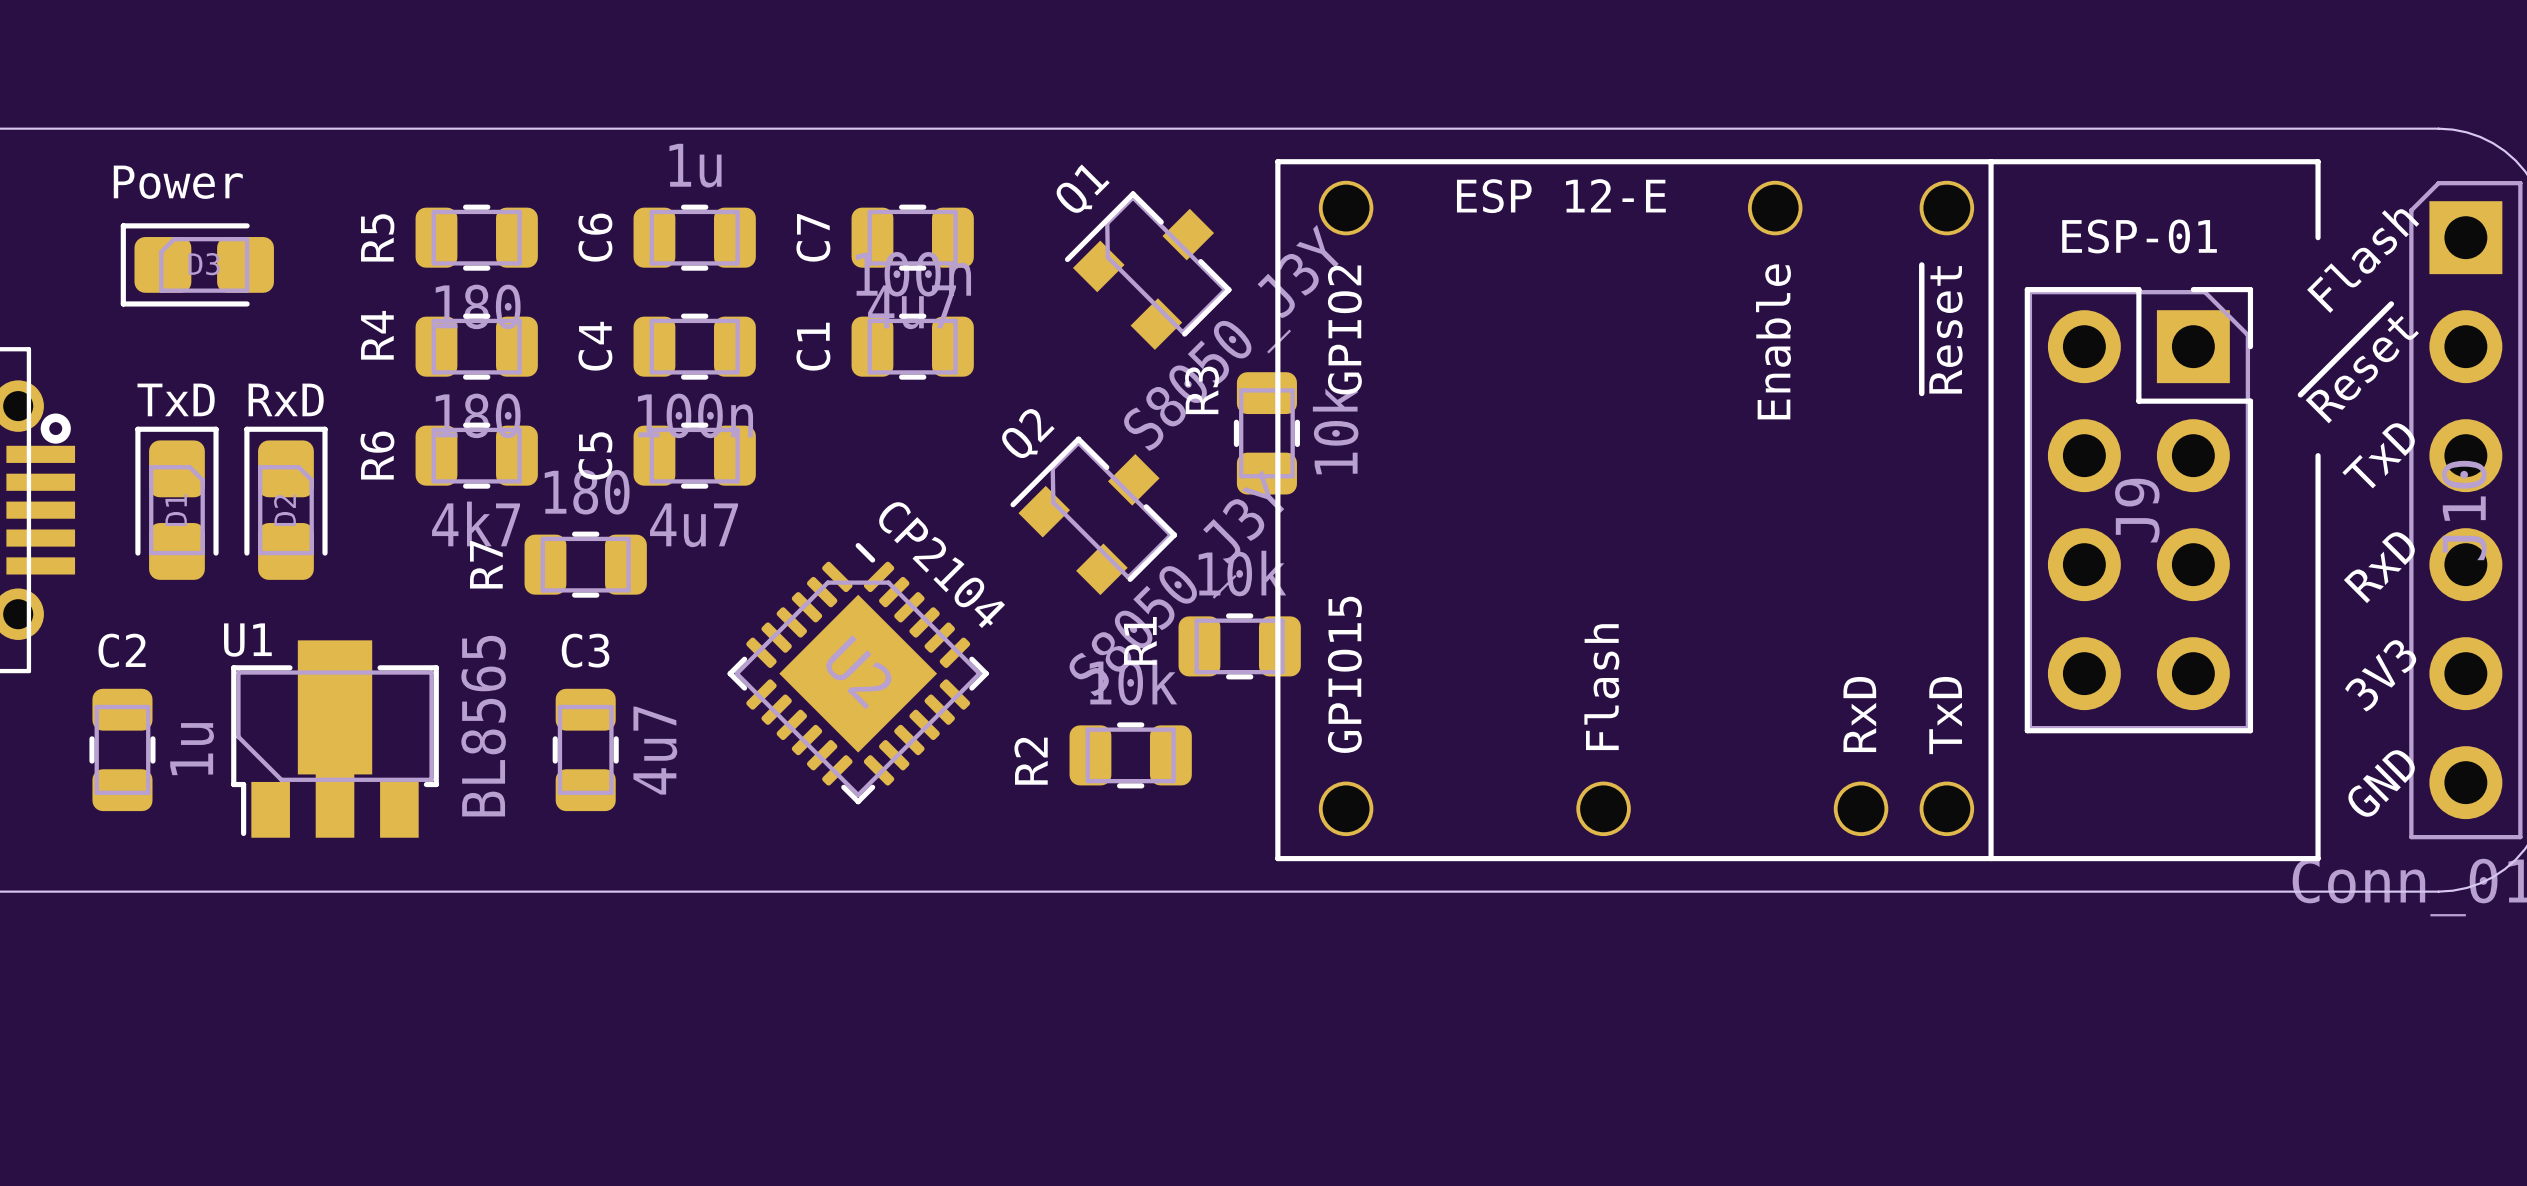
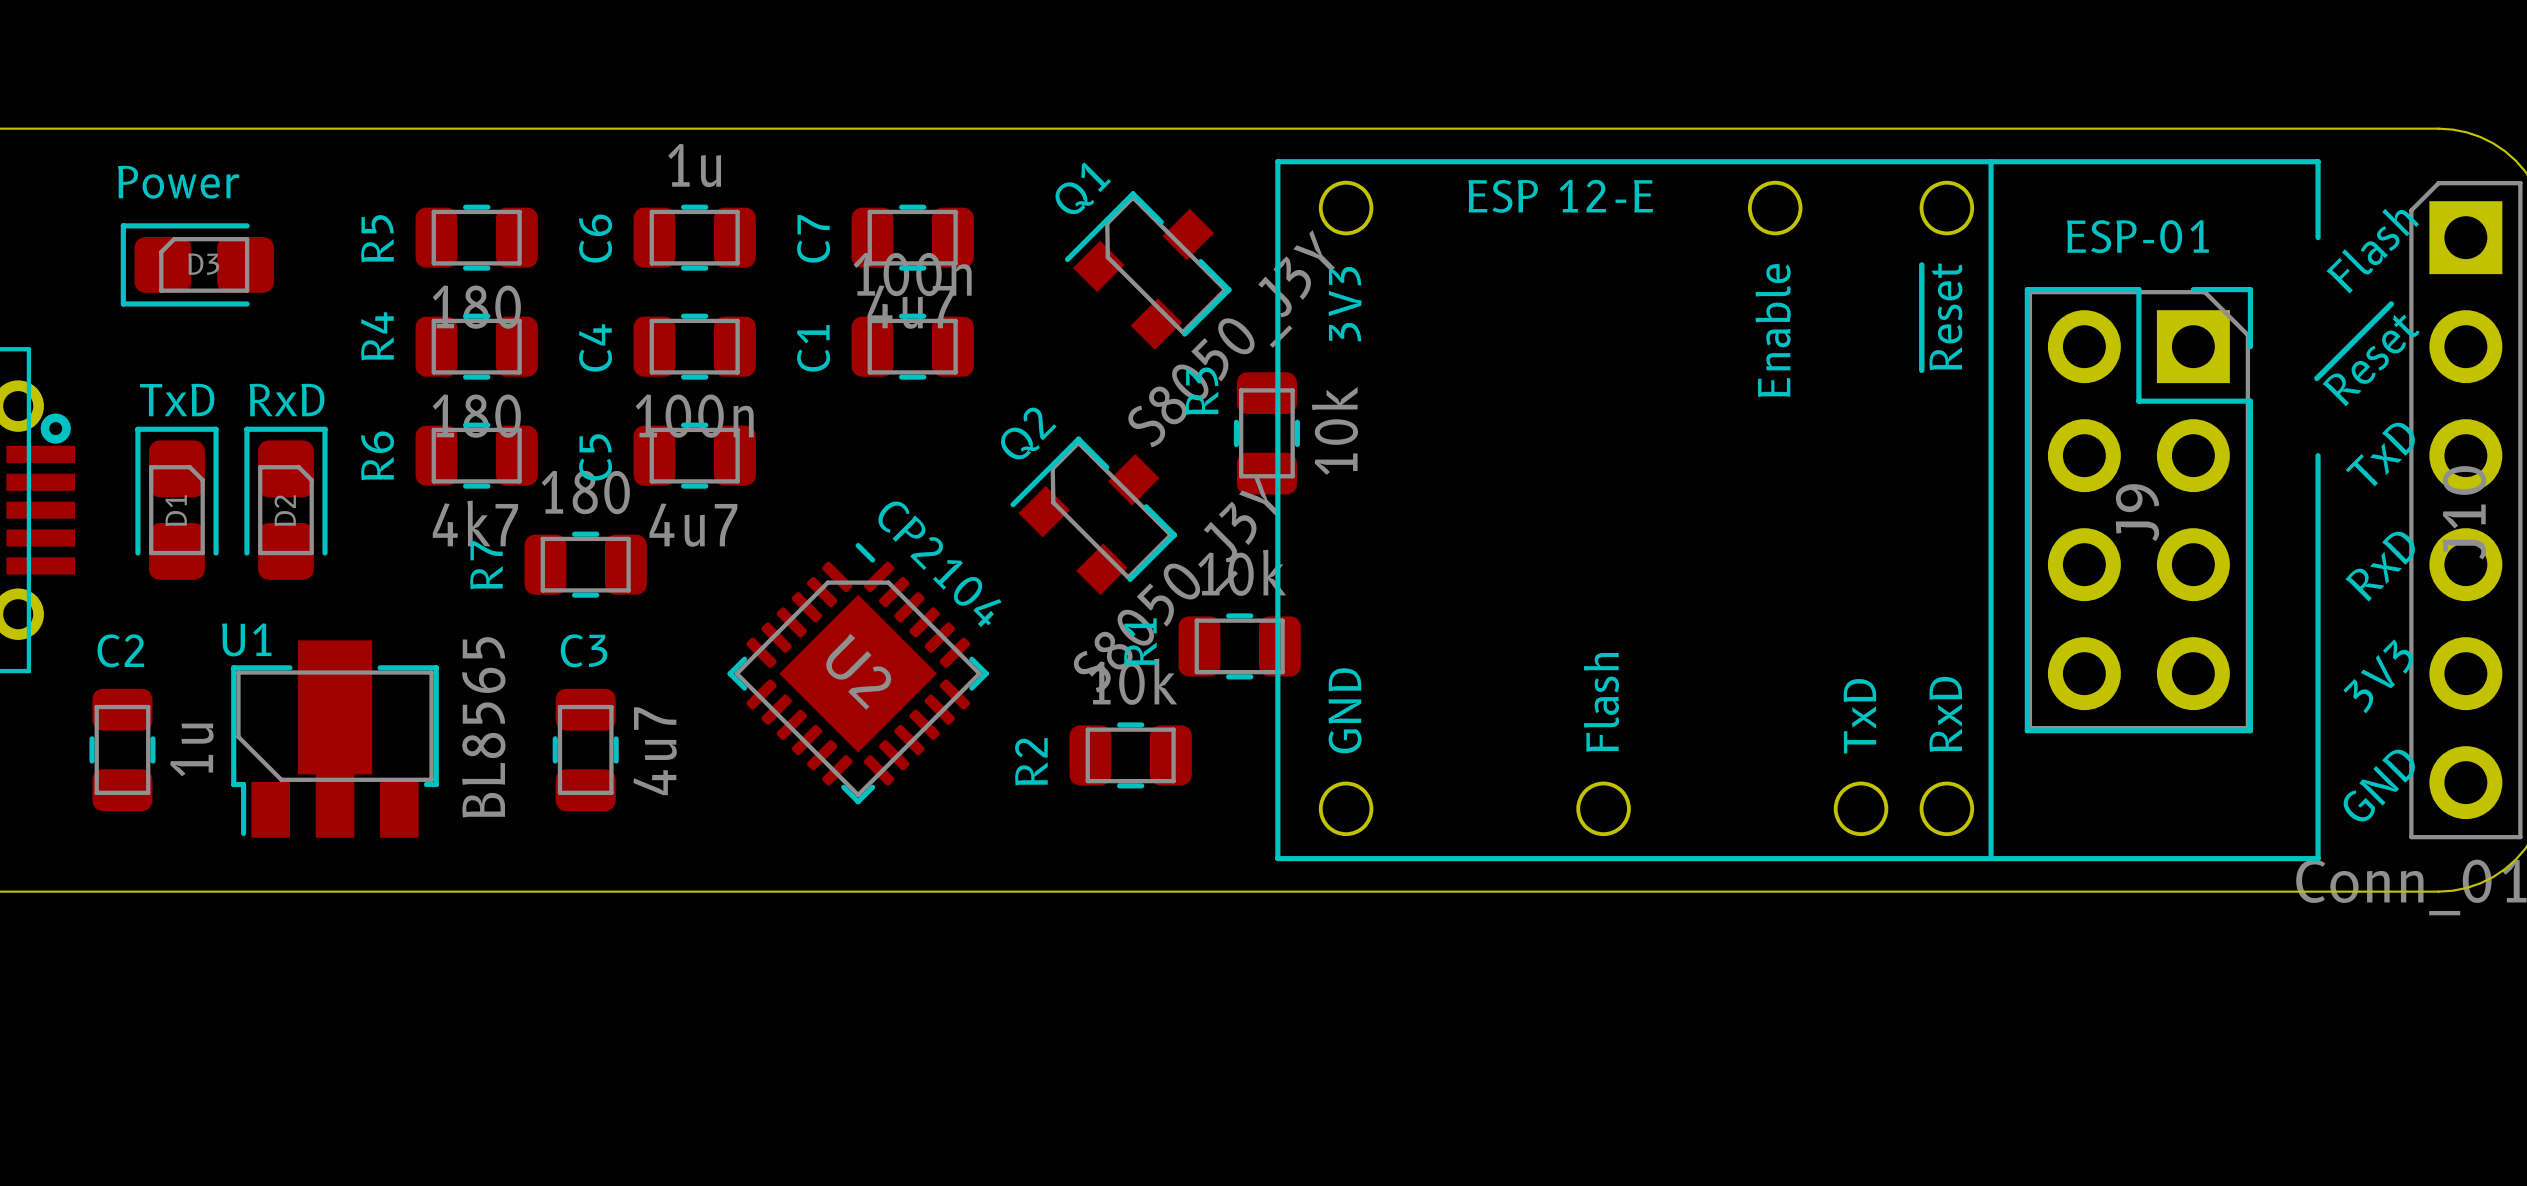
part value: GPIO2 (1344, 329) -> 3V3 (1345, 304)
part value: GPIO15 (1344, 674) -> GND (1345, 710)
part value: RxD (1859, 714) -> TxD (1859, 716)
part value: TxD (1945, 715) -> RxD (1945, 714)

